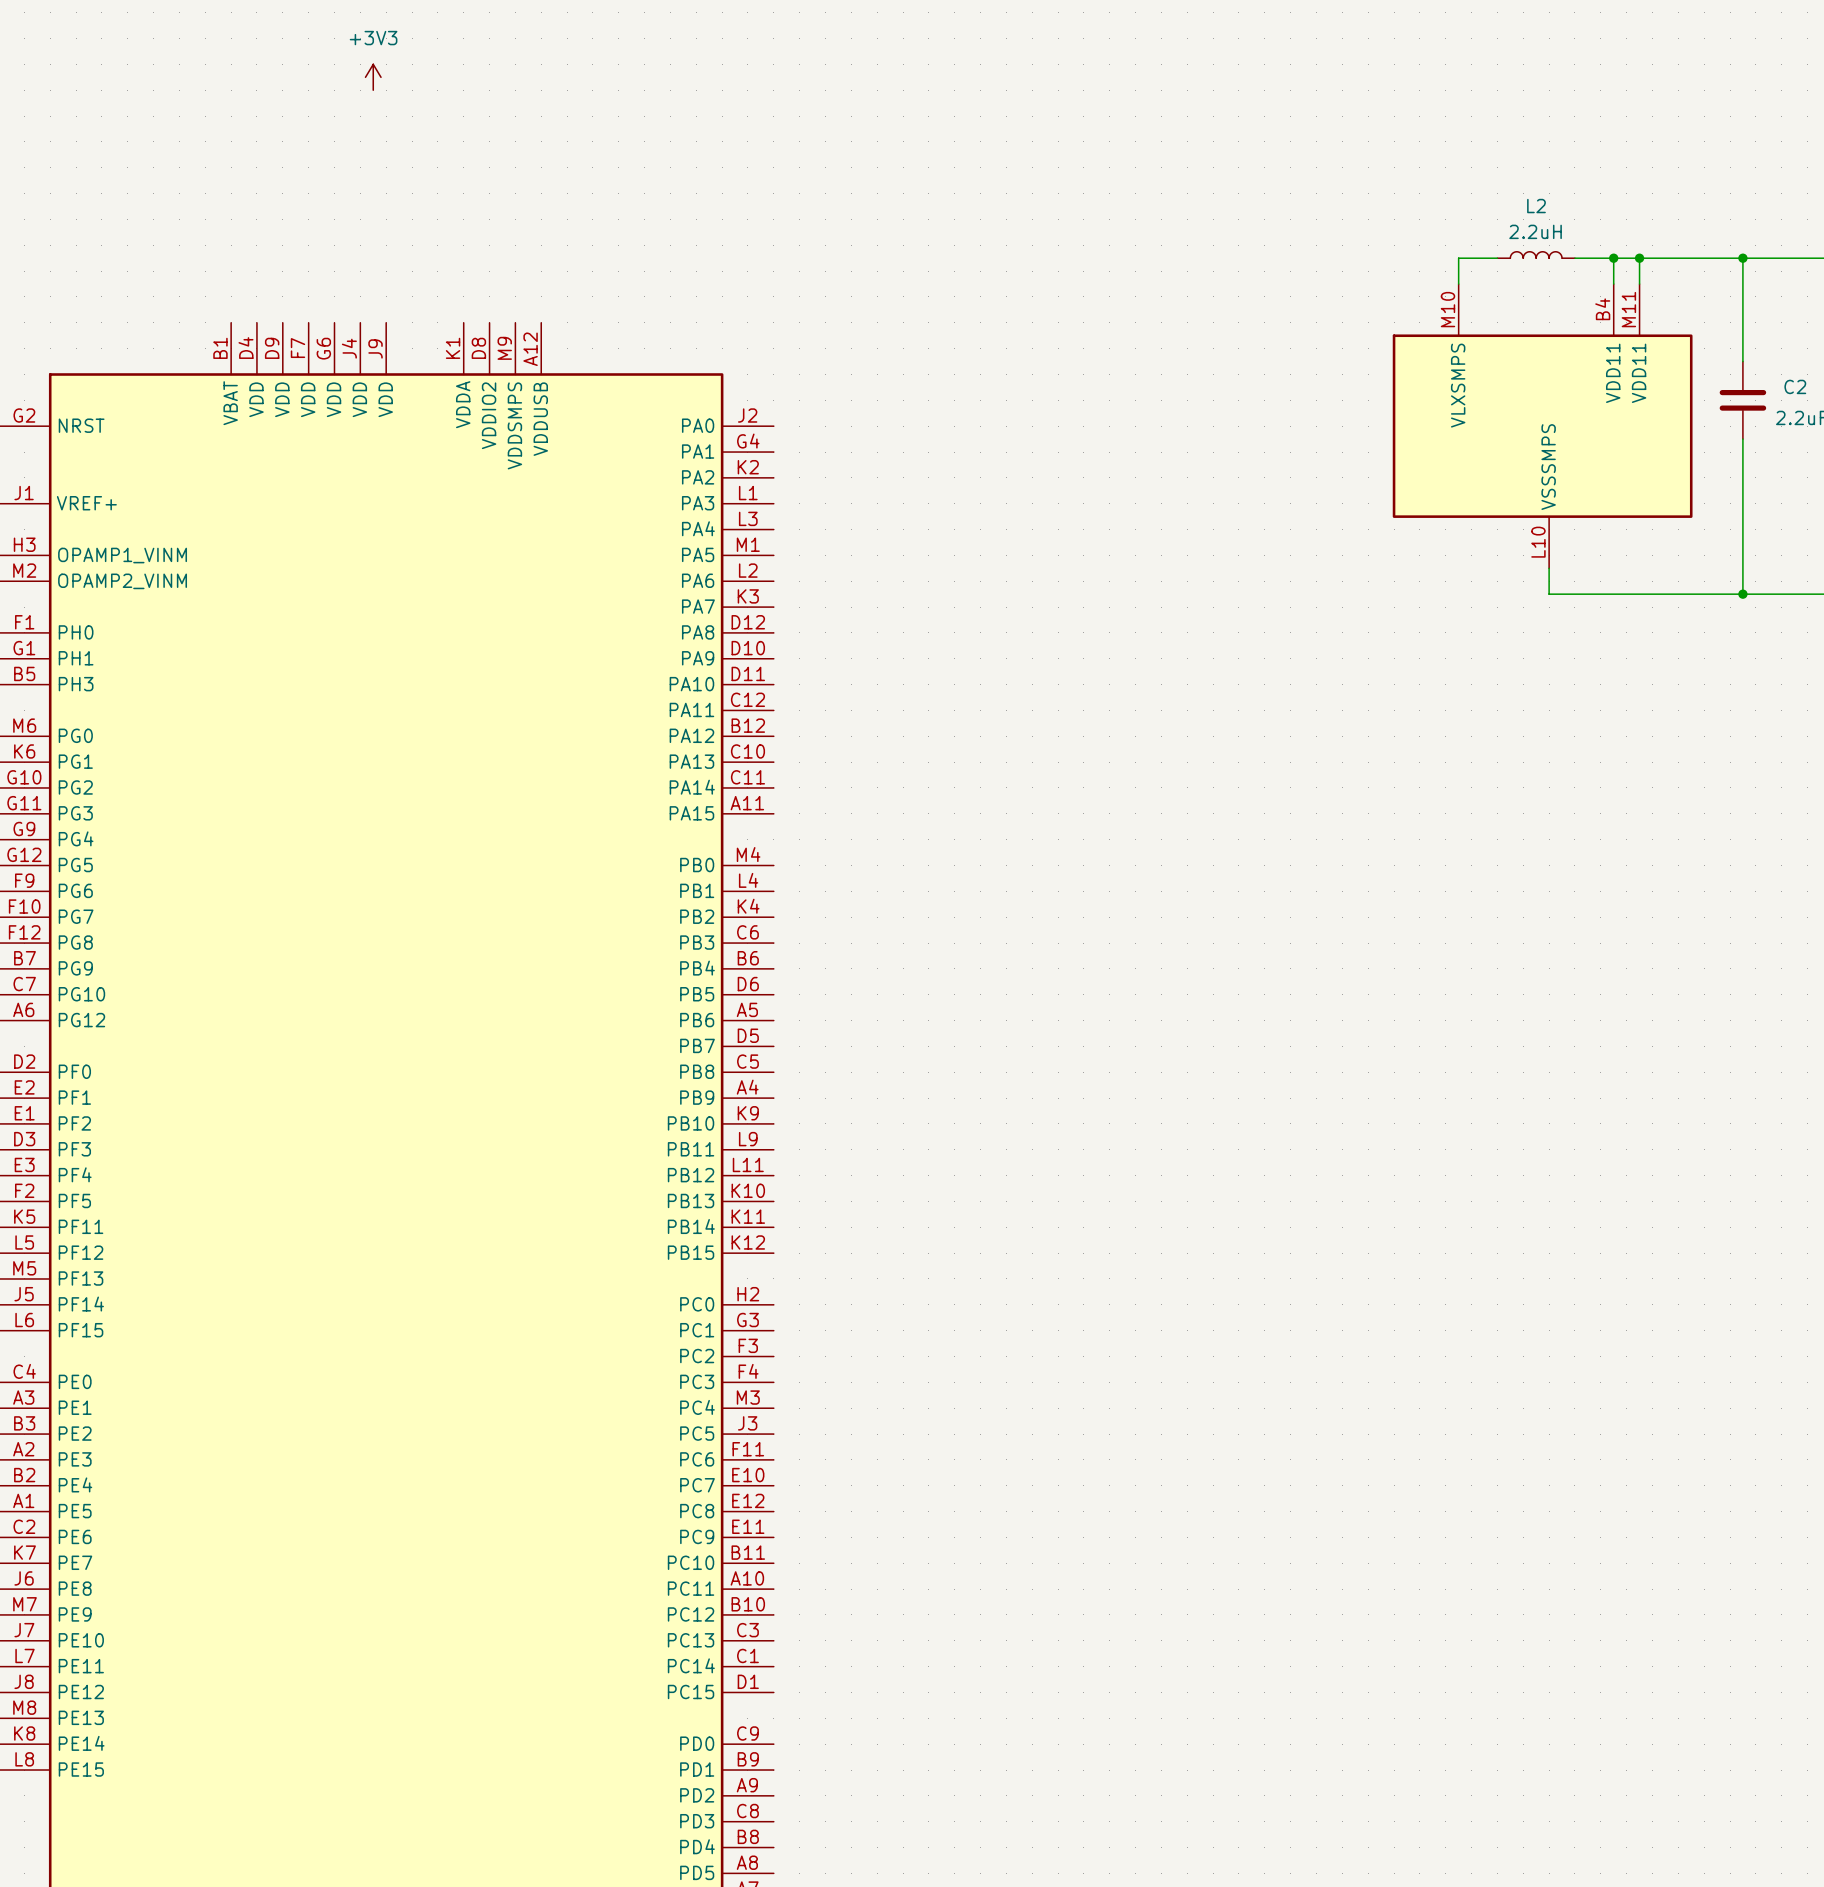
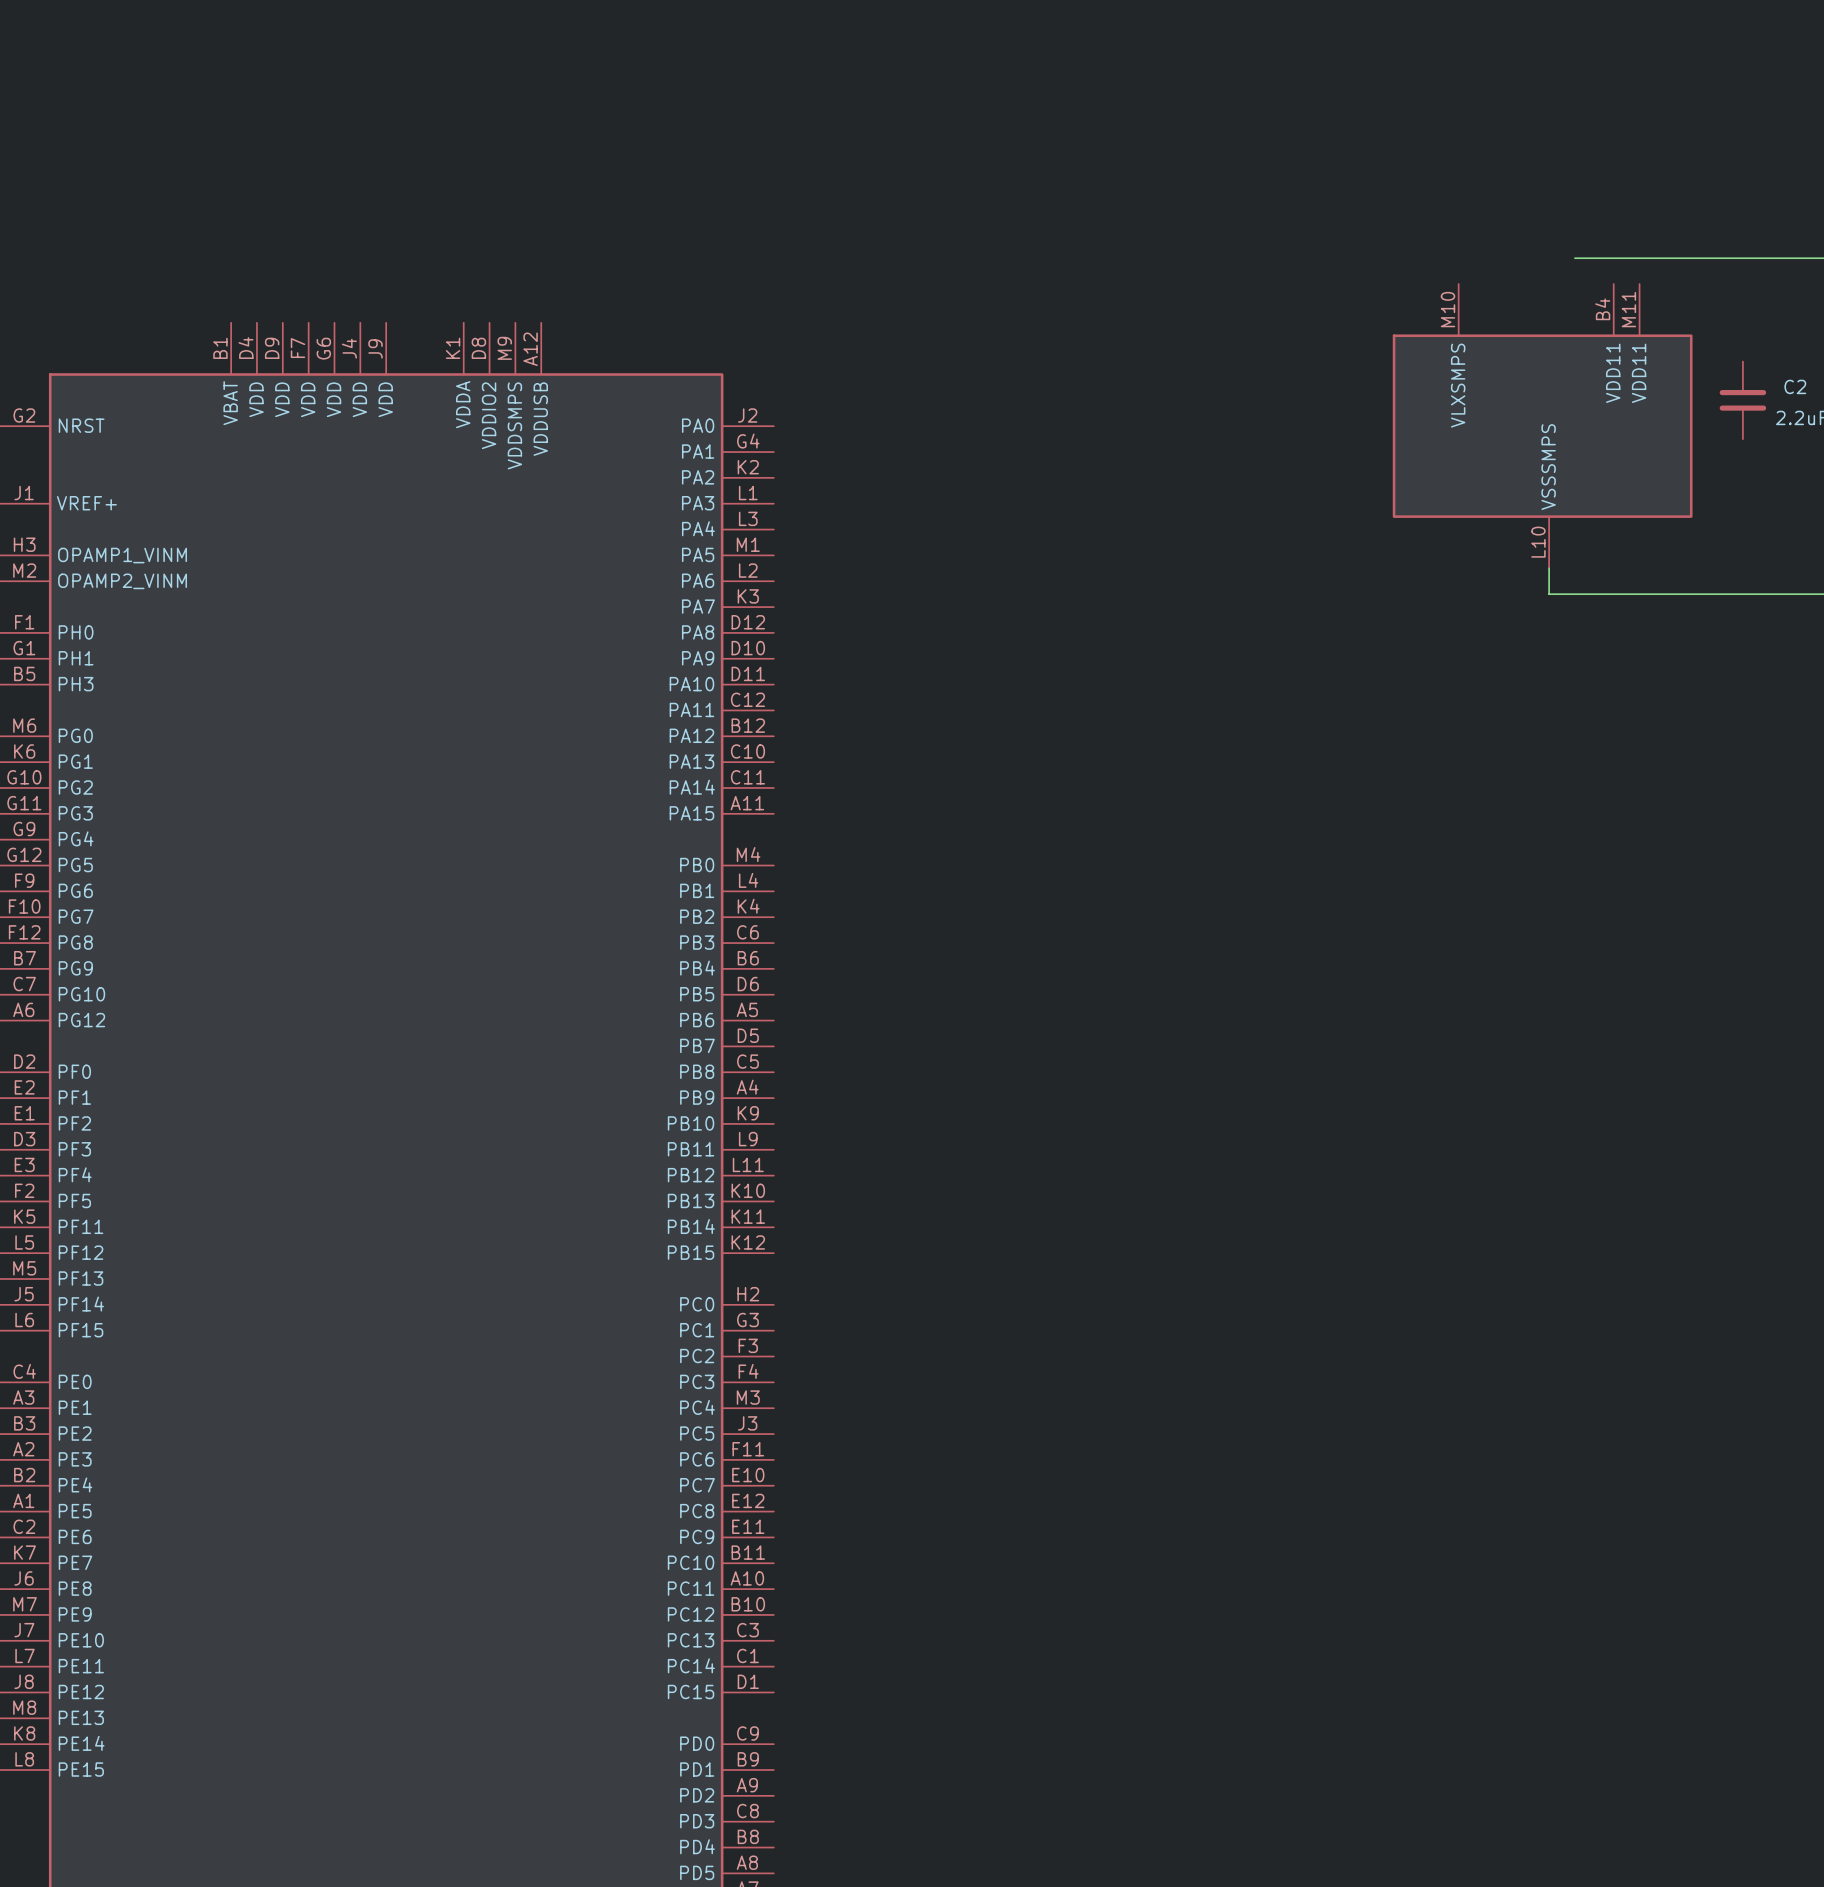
power symbol: +3V3 (373, 77) -> none
L2: 2.2uH (1536, 254) -> none
wire: (1497, 258) (1458, 258) (1458, 284) -> none
wire: (1613, 258) (1613, 284) -> none
junction: (1613, 258) -> none
wire: (1639, 258) (1639, 284) -> none
junction: (1639, 258) -> none
wire: (1742, 258) (1742, 361) -> none
junction: (1742, 258) -> none
wire: (1742, 439) (1742, 594) -> none
junction: (1742, 594) -> none

